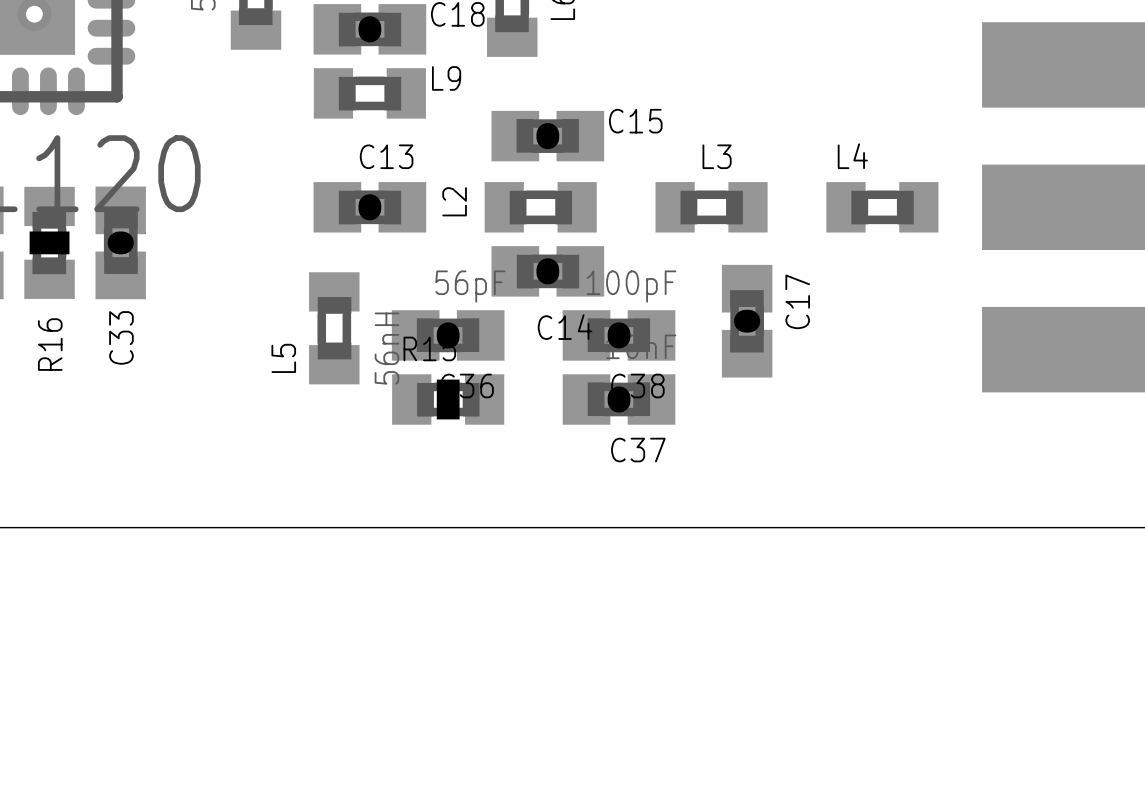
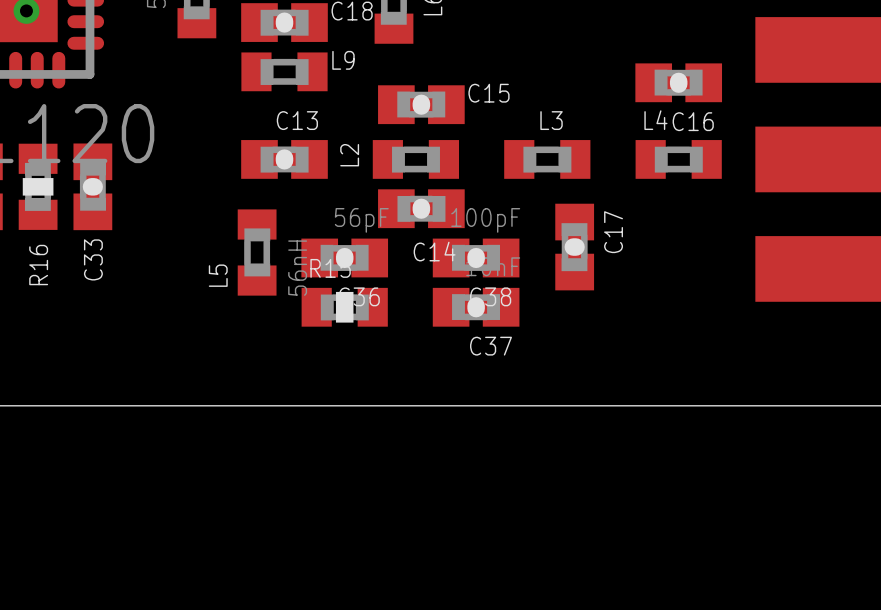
C16: none -> (678, 82)

